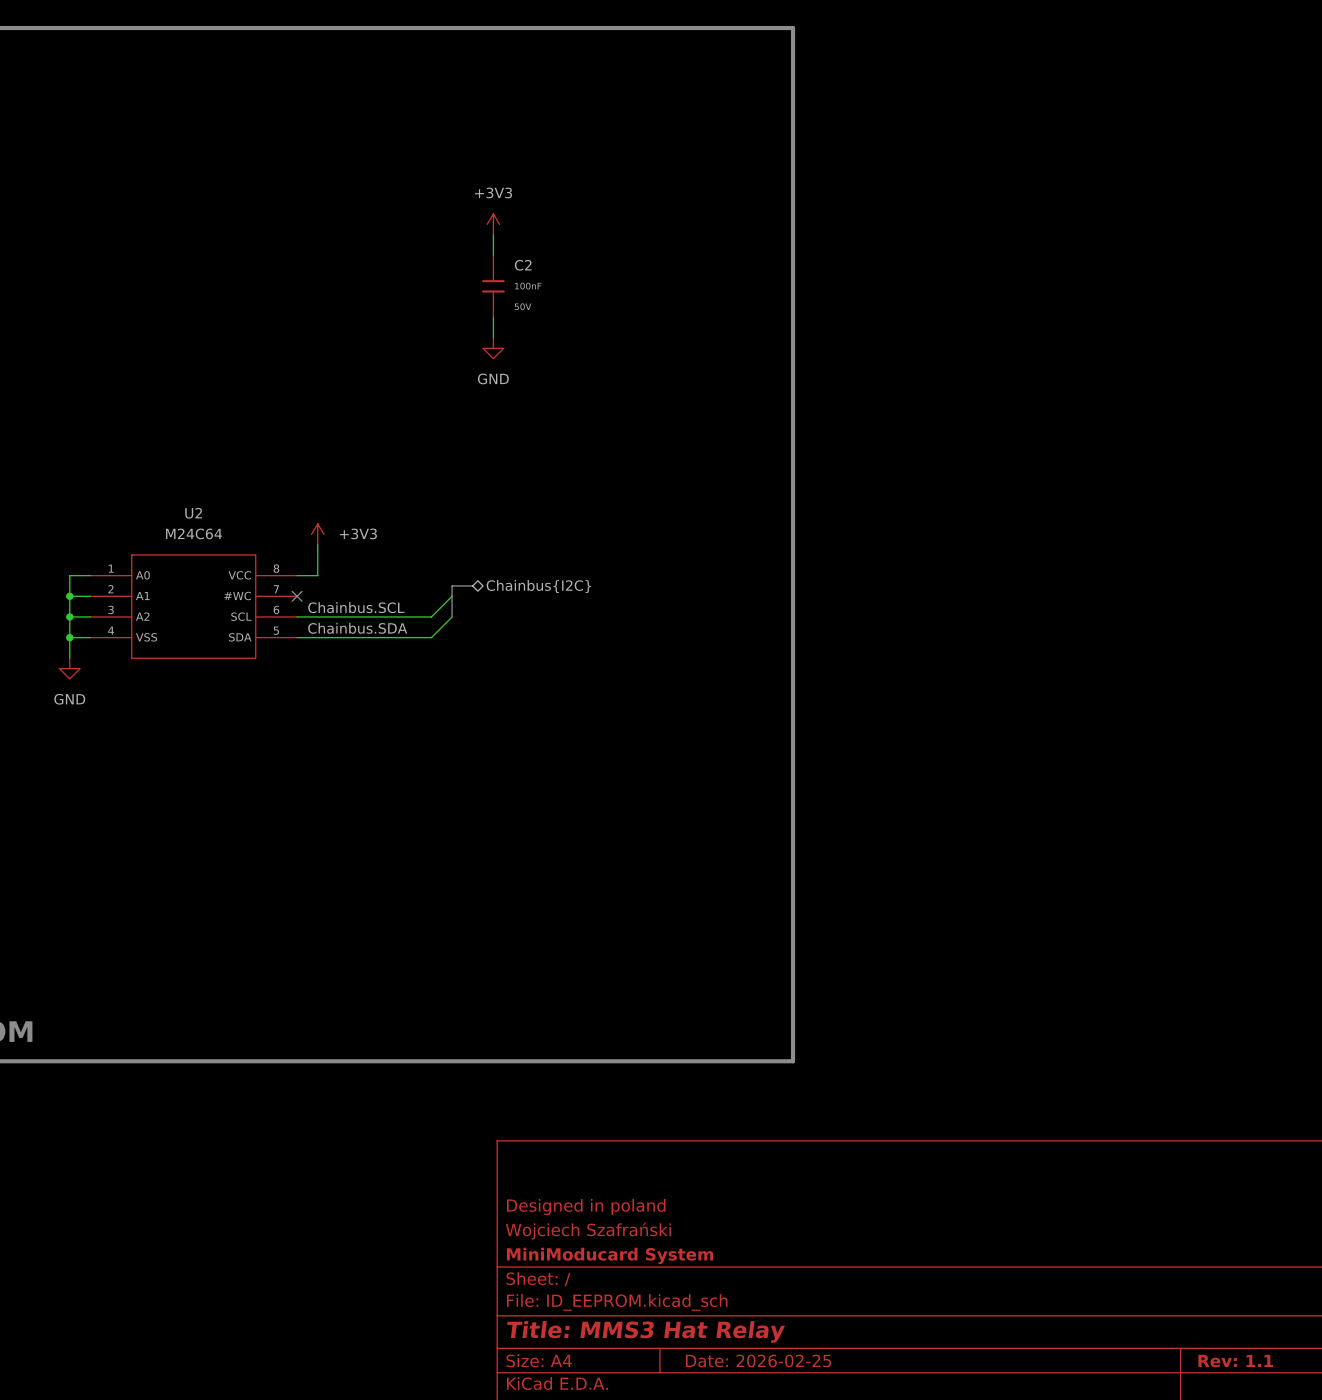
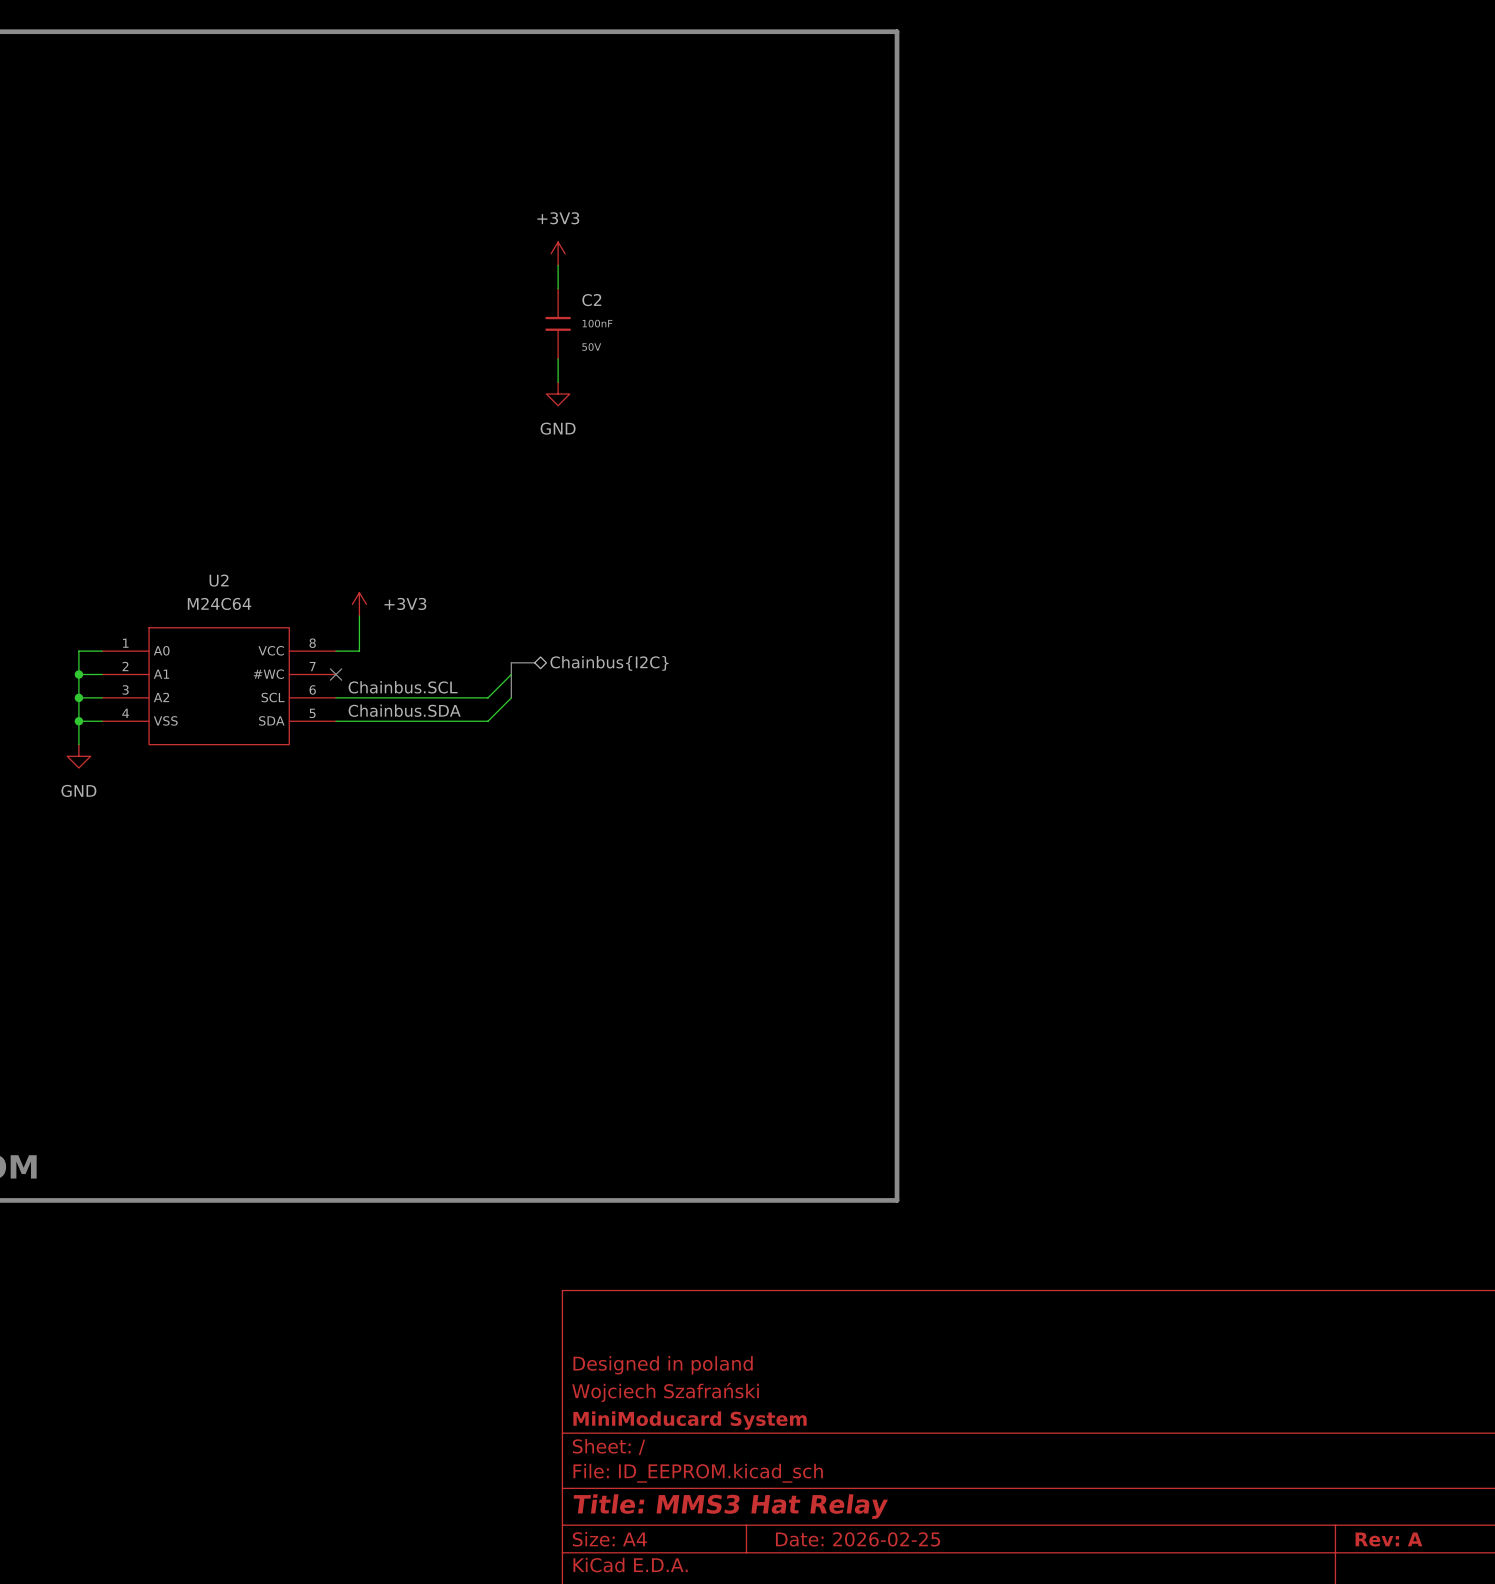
title block: Rev: 1.1 (1235, 1361) -> Rev: A (1388, 1539)

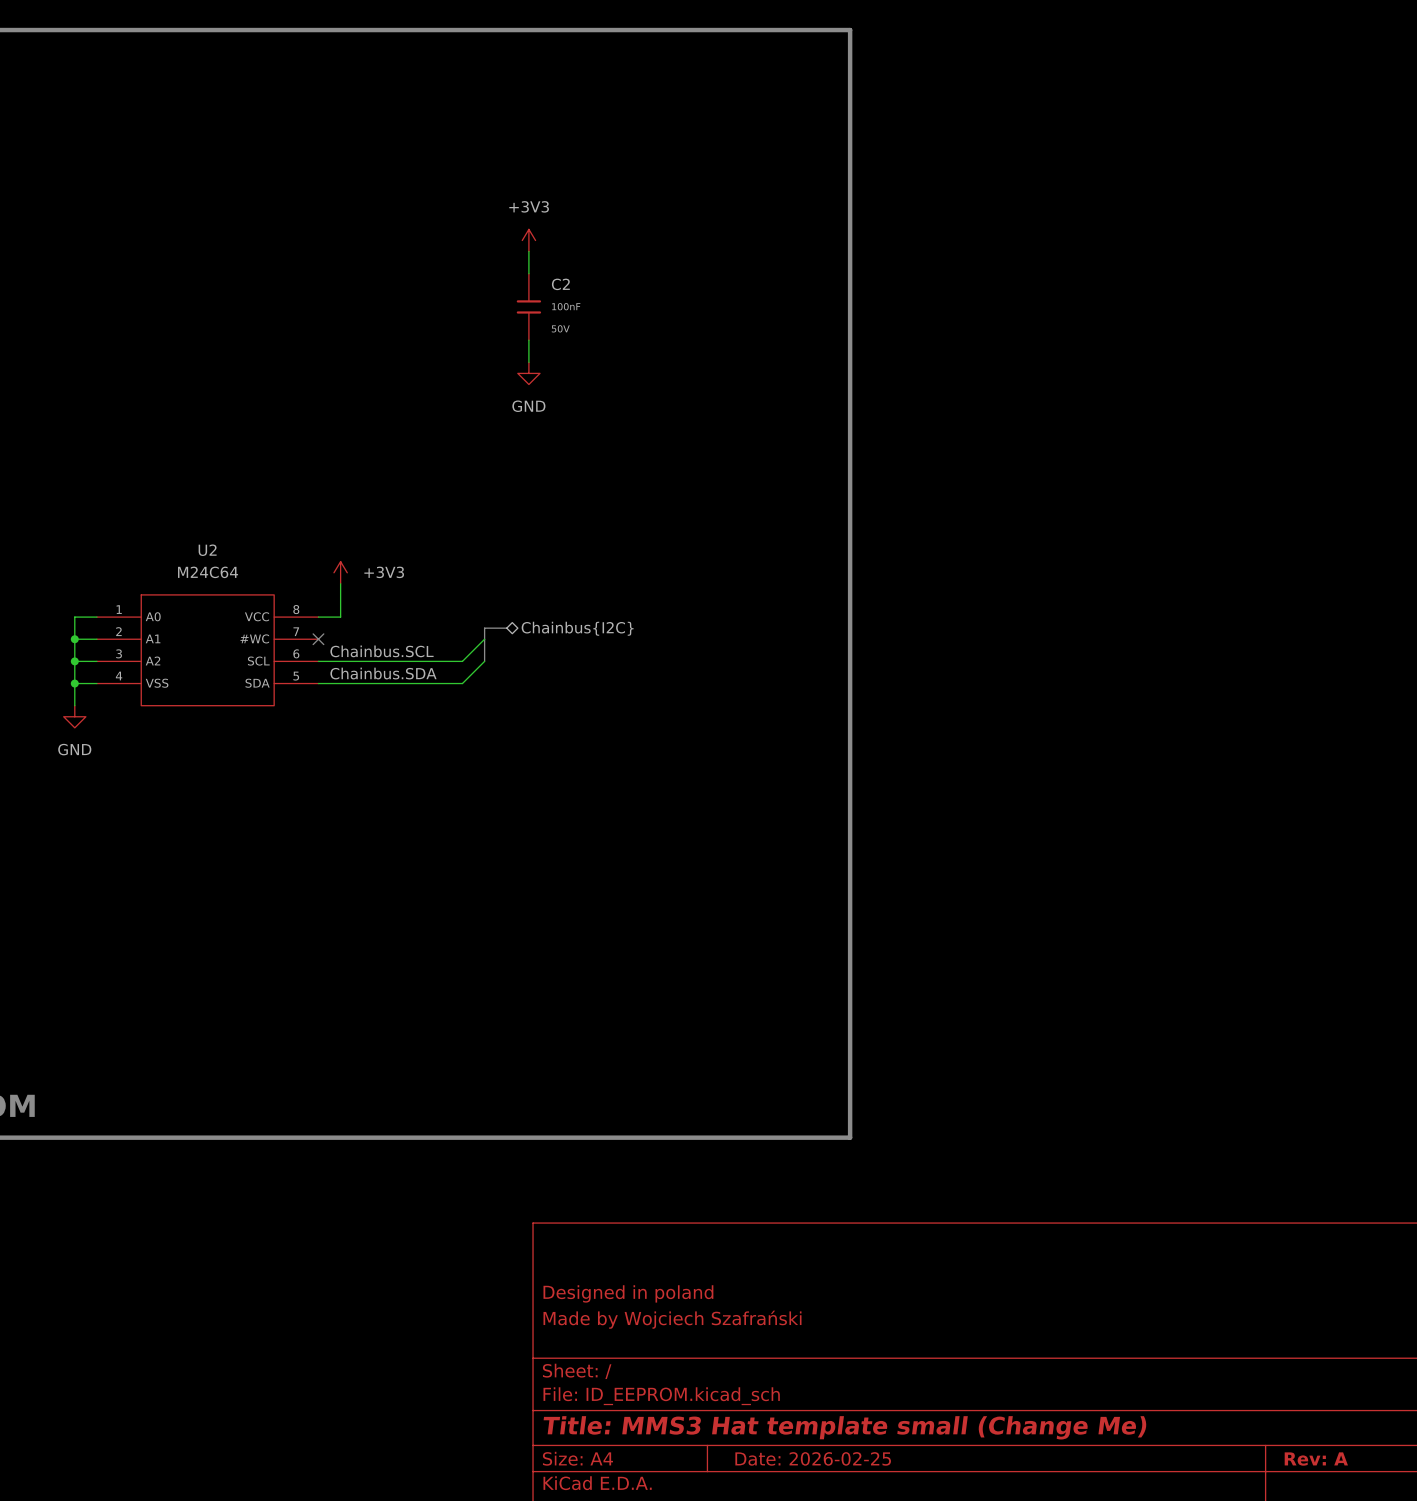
title block: Wojciech Szafrański (665, 1392) -> Made by Wojciech Szafrański (672, 1319)
title block: MiniModucard System (690, 1420) -> none
title block: Title: MMS3 Hat Relay (730, 1506) -> Title: MMS3 Hat template small (Change Me) (845, 1427)

